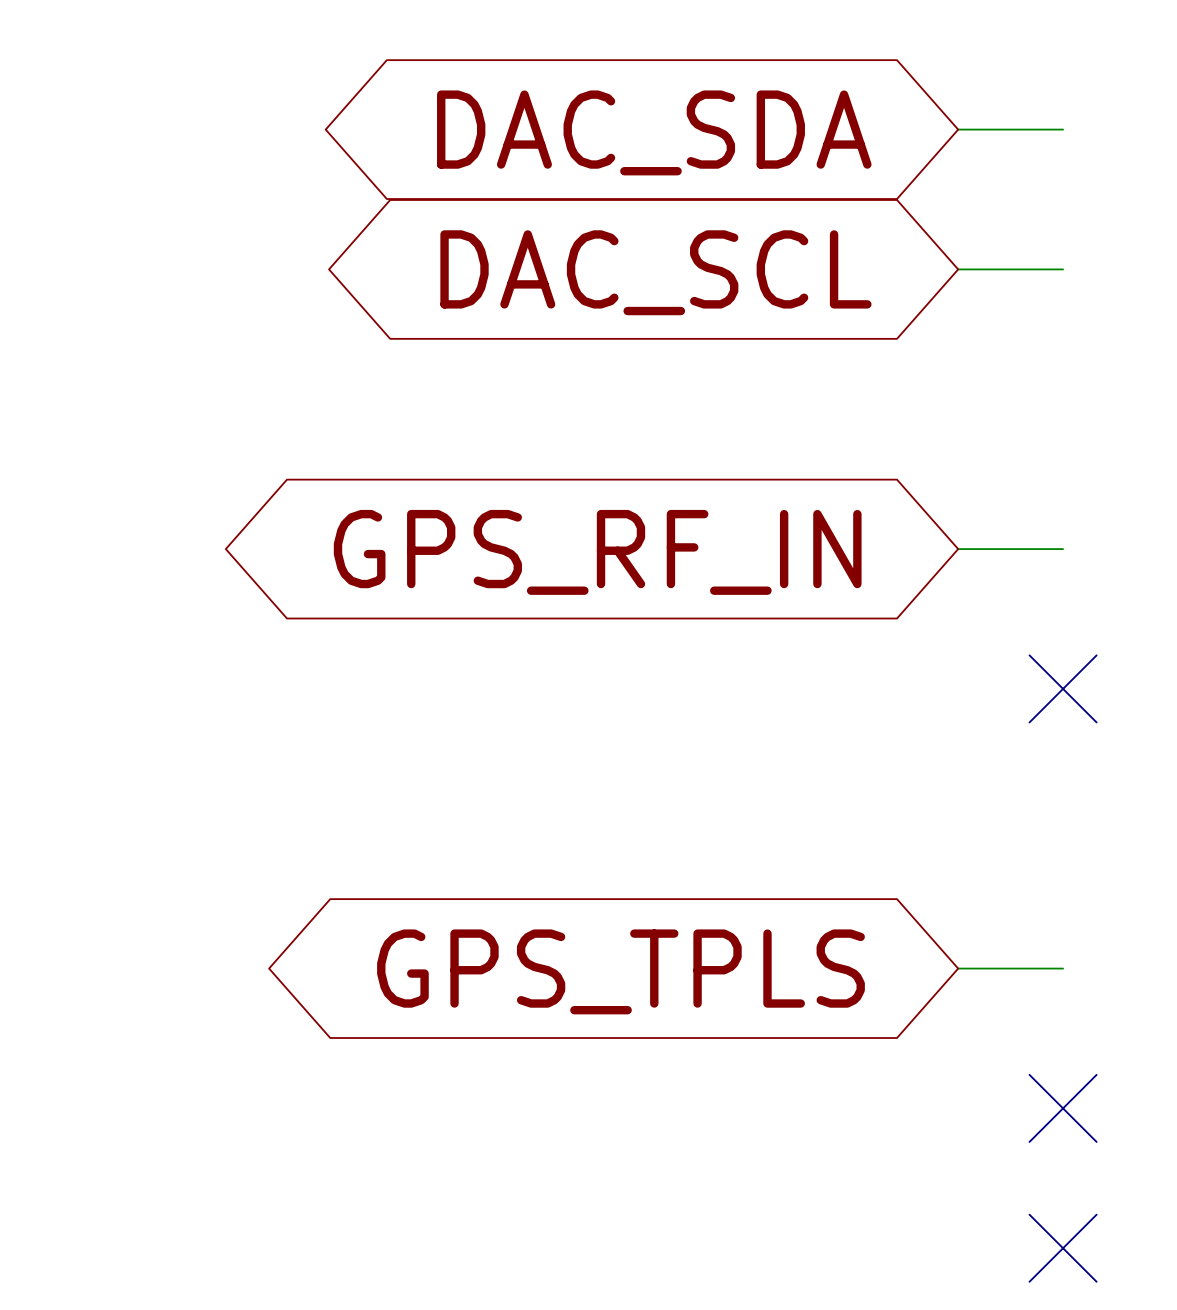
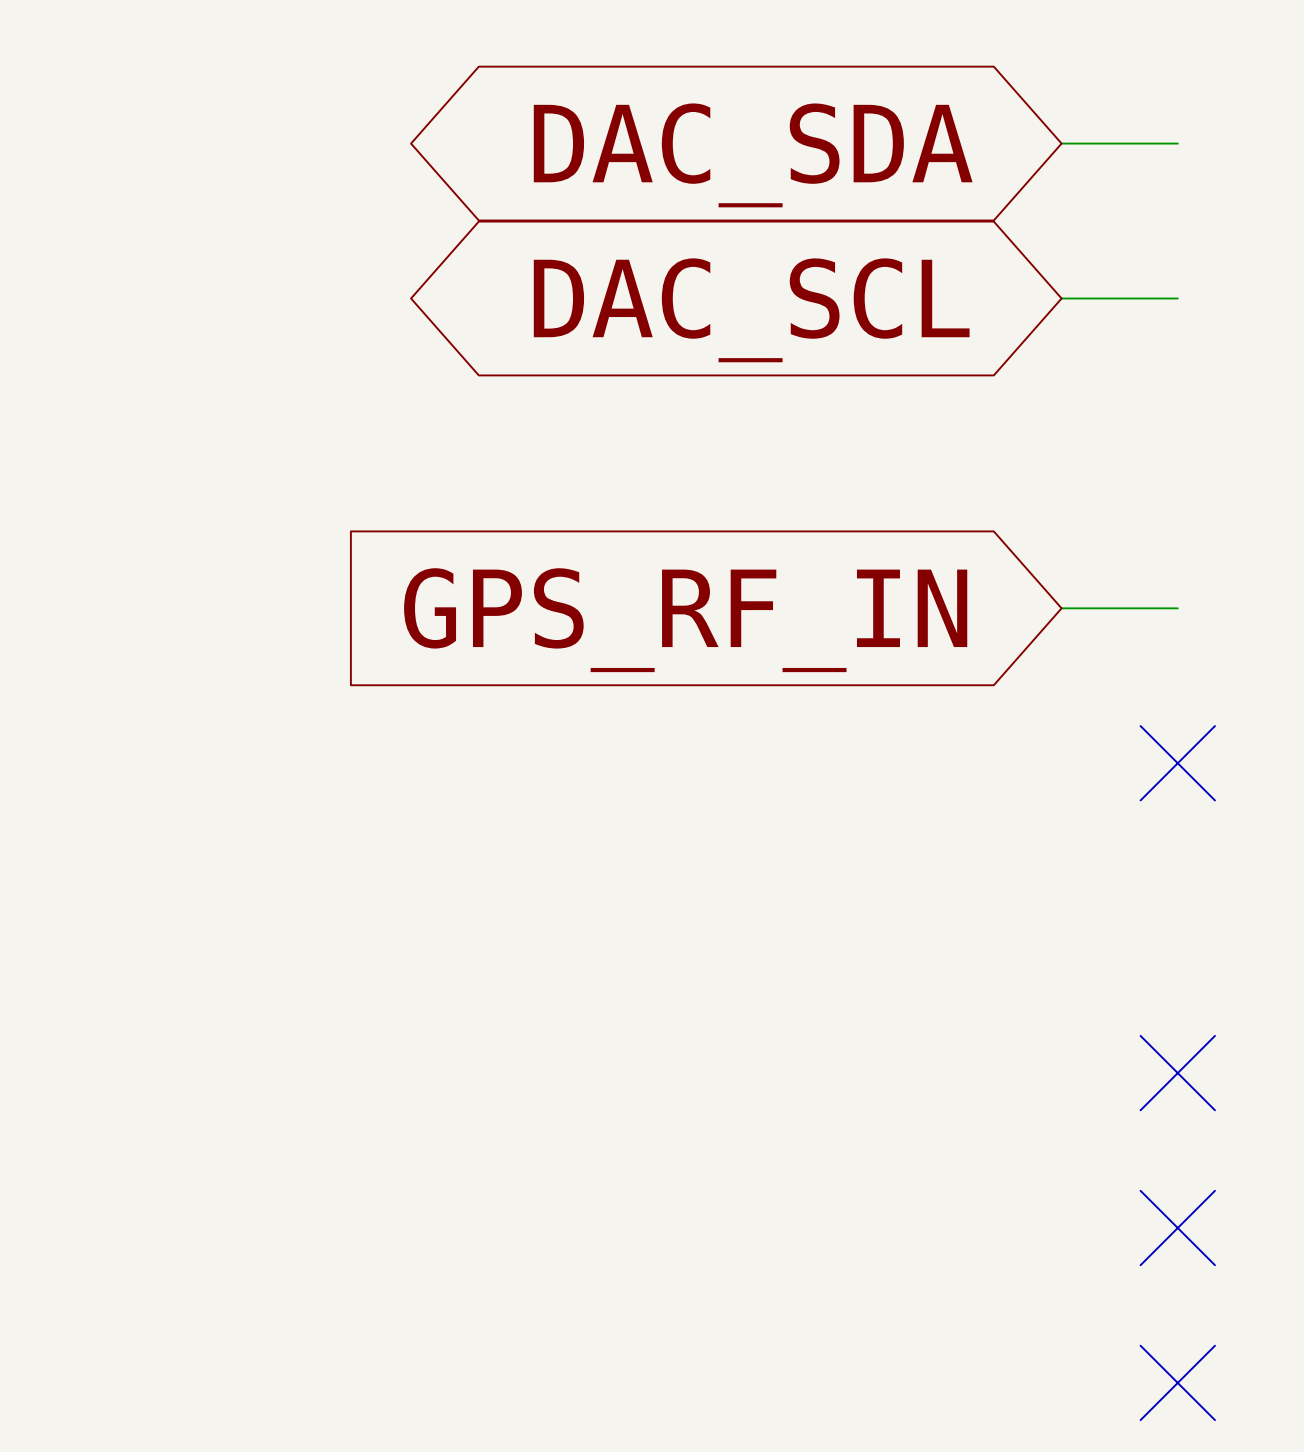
global label shape: bidirectional (597, 552) -> input (685, 620)
wire: (958, 968) (1063, 968) -> none
no-connect mark: none -> (1177, 1073)
global label: GPS_TPLS (620, 971) -> none

